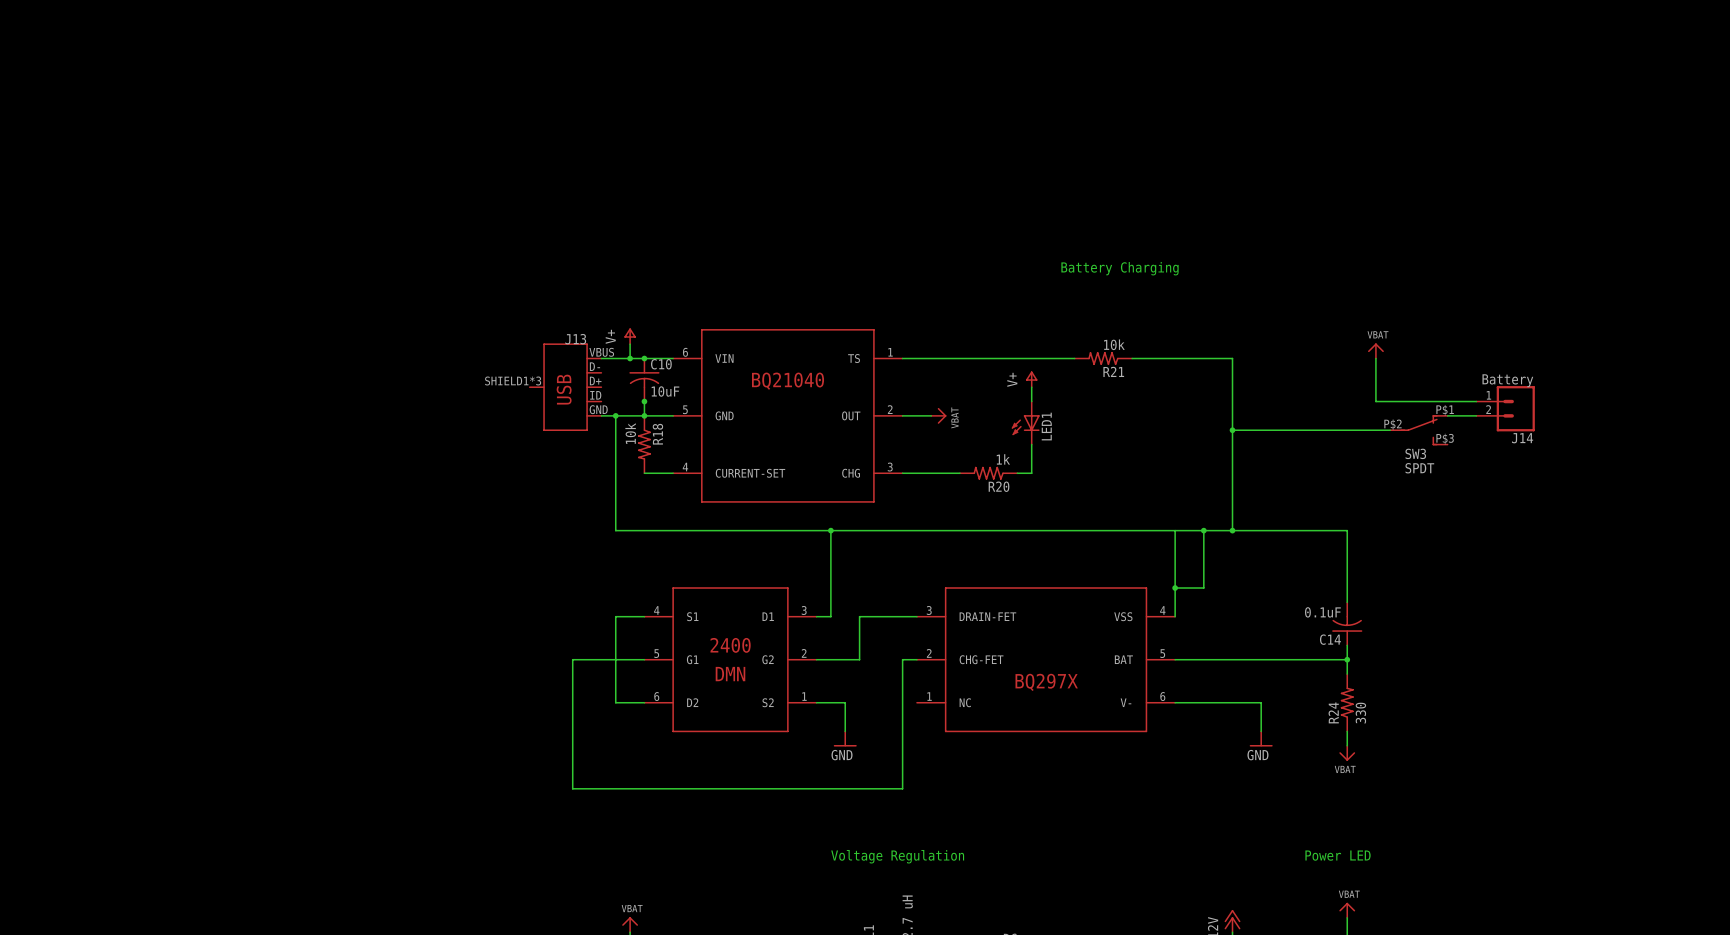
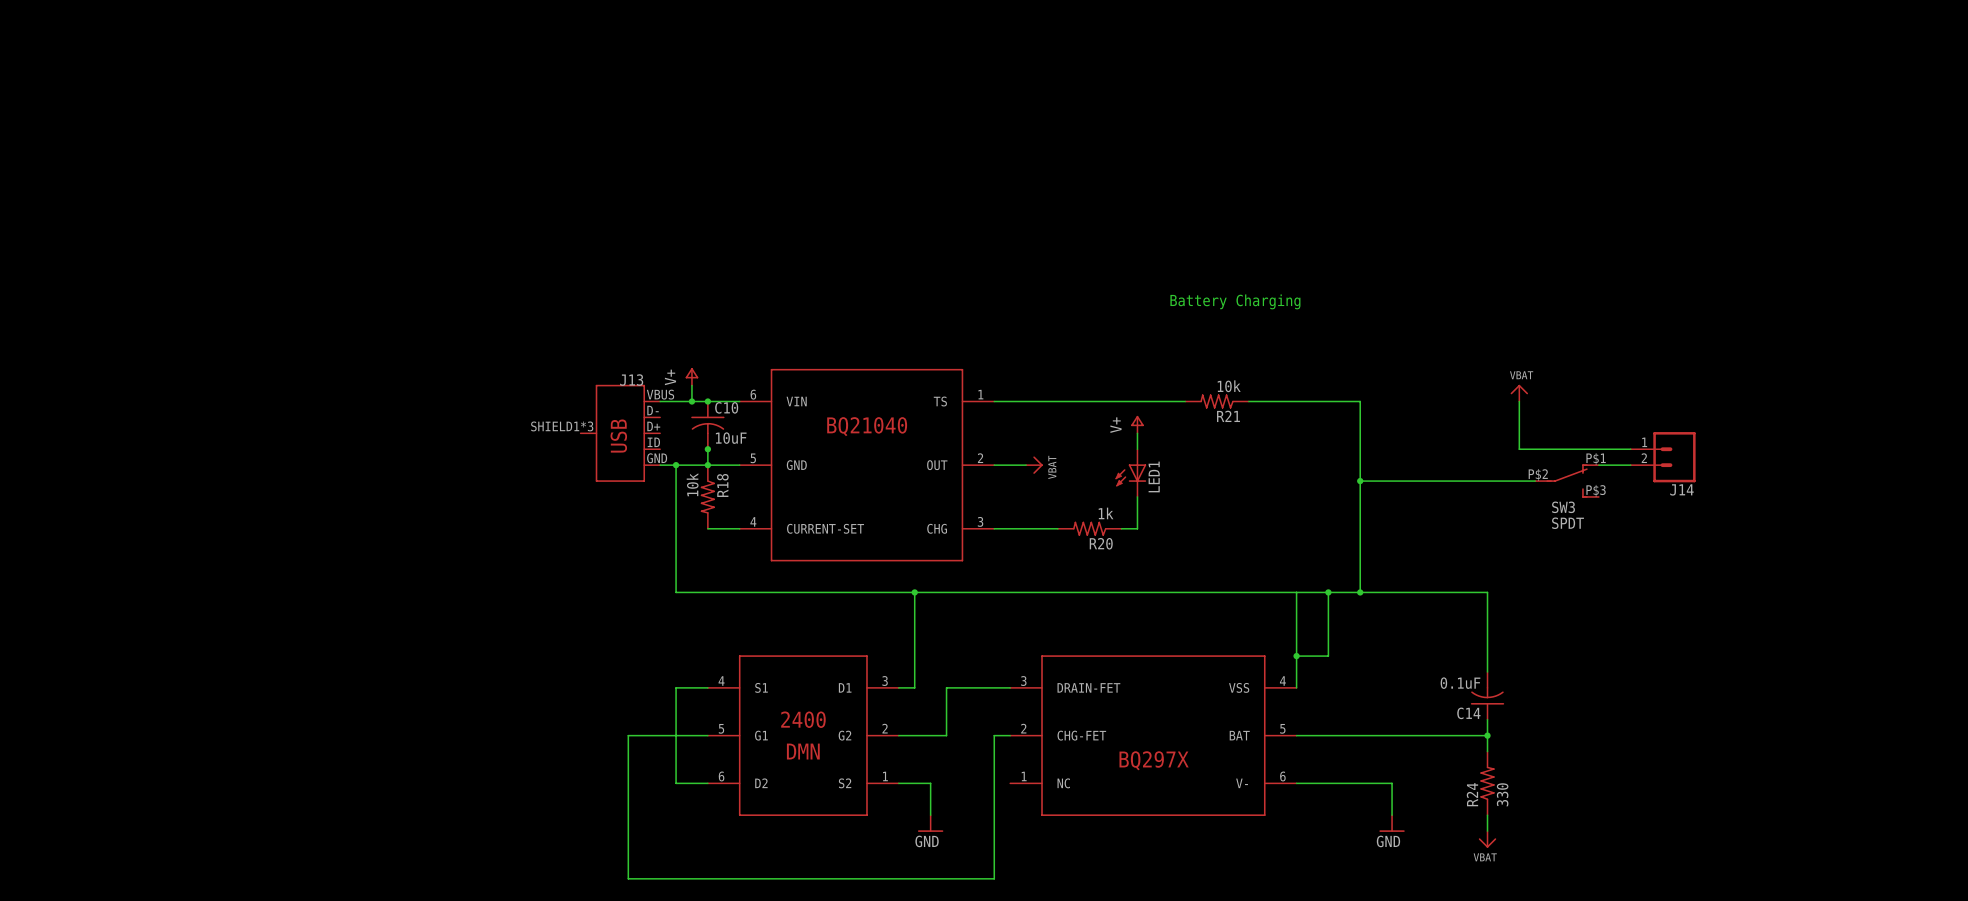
J14 value: Battery (1507, 380) -> none

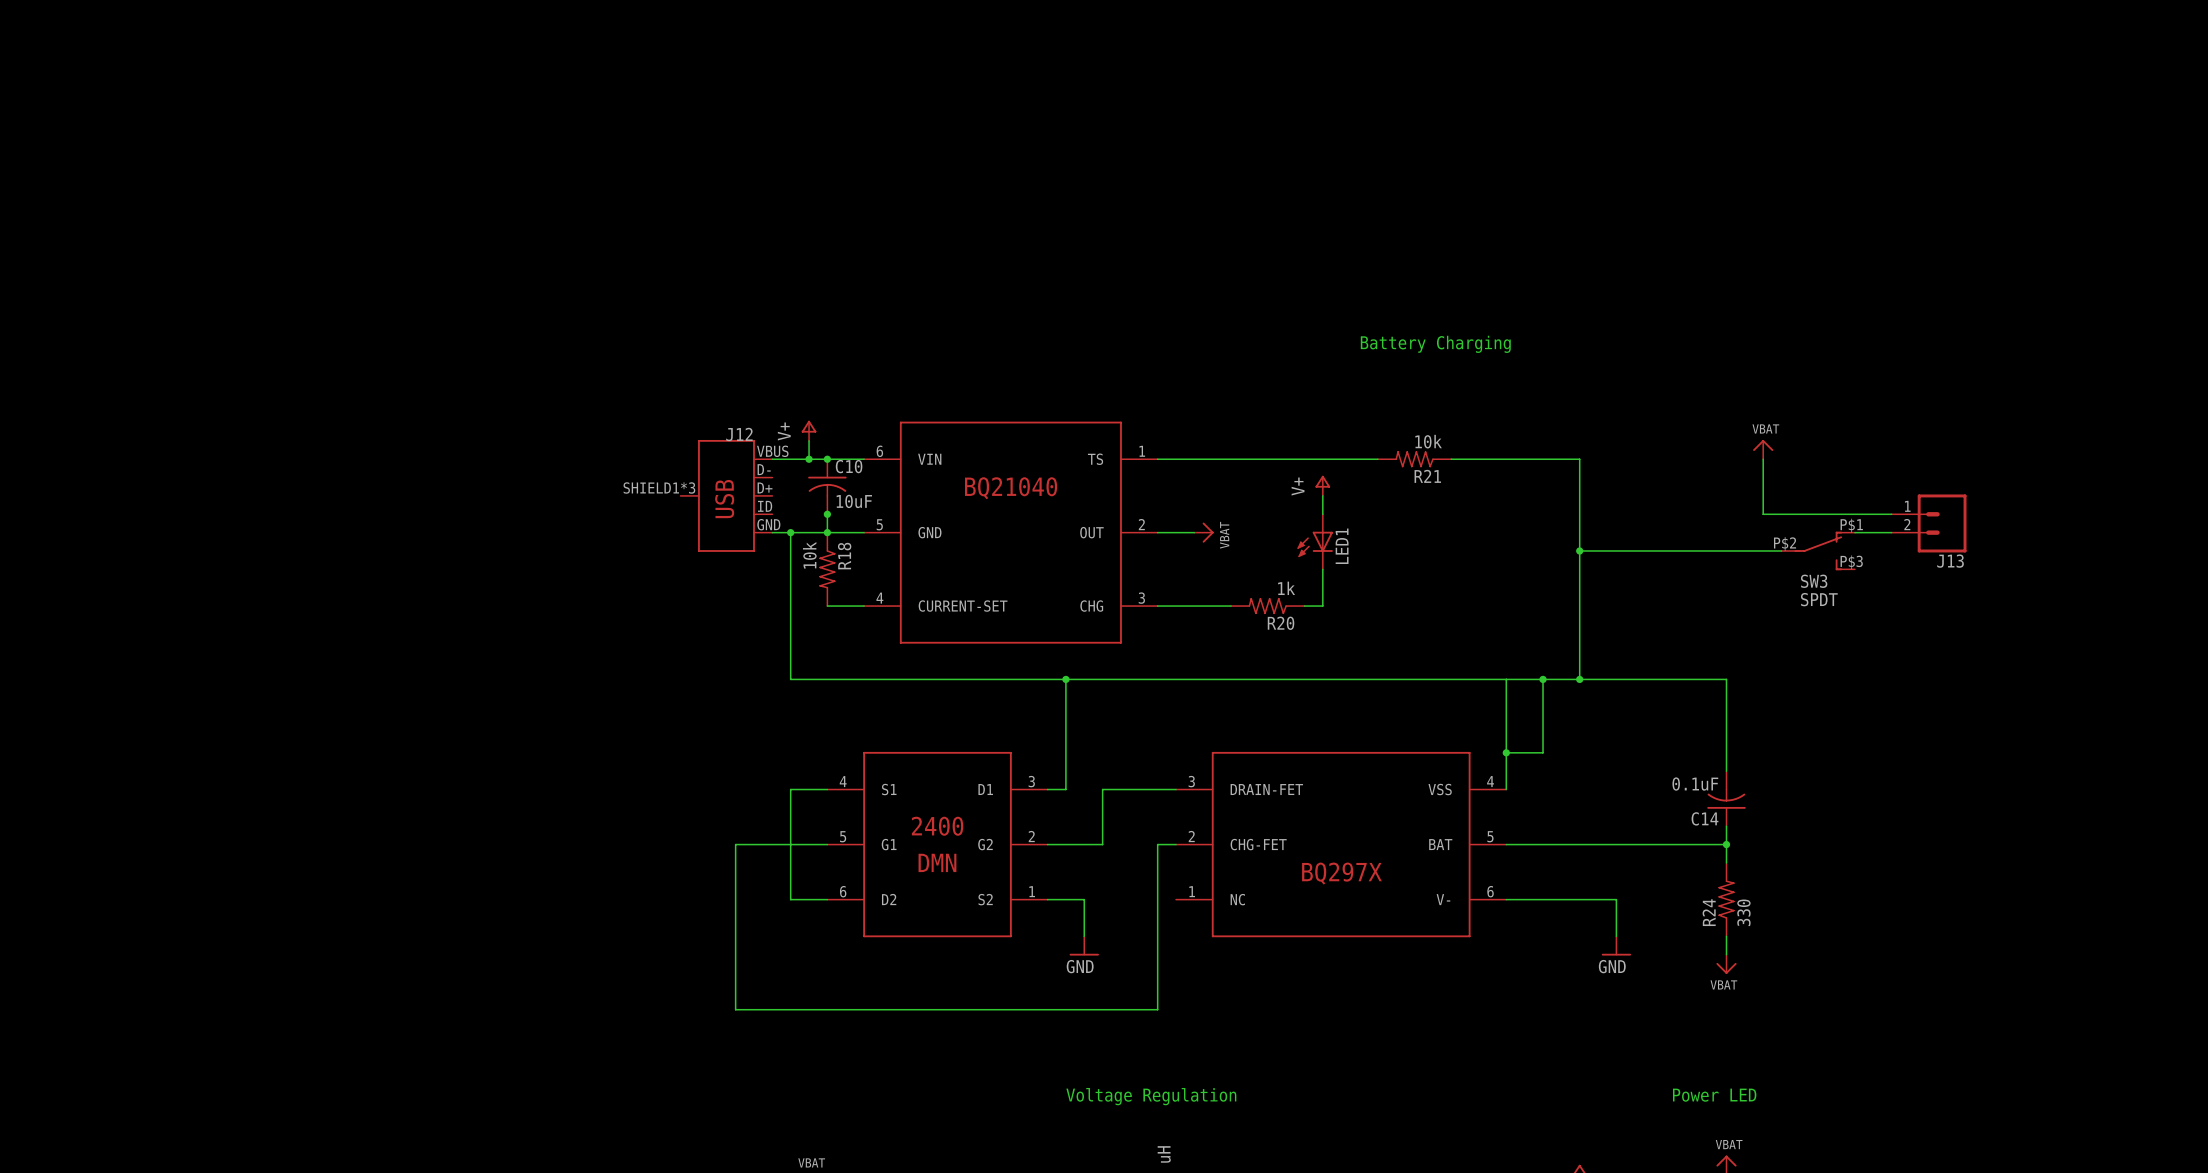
J13 name: J13 (631, 380) -> J12 (739, 434)
J14 name: J14 (1681, 489) -> J13 (1950, 561)

